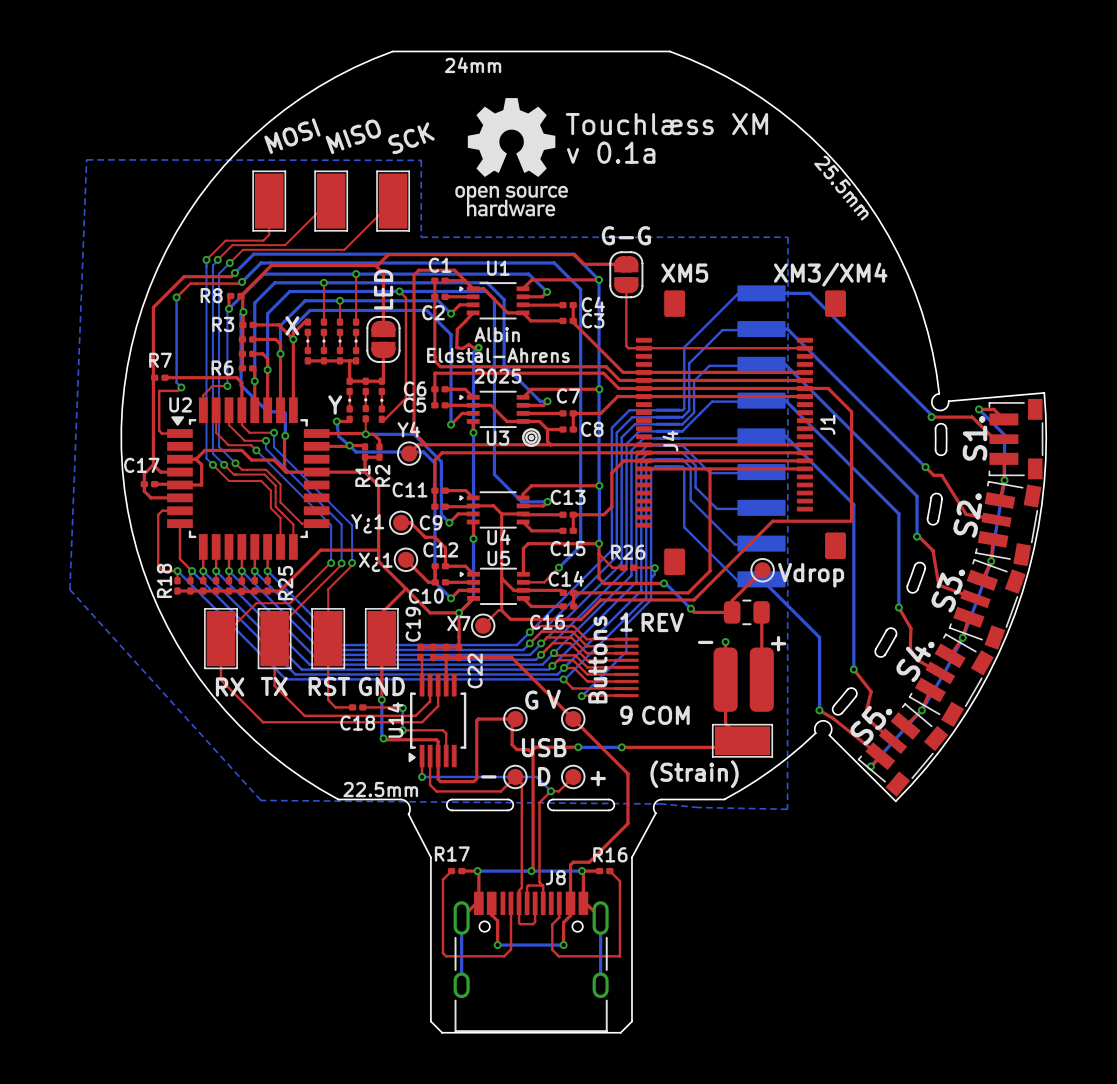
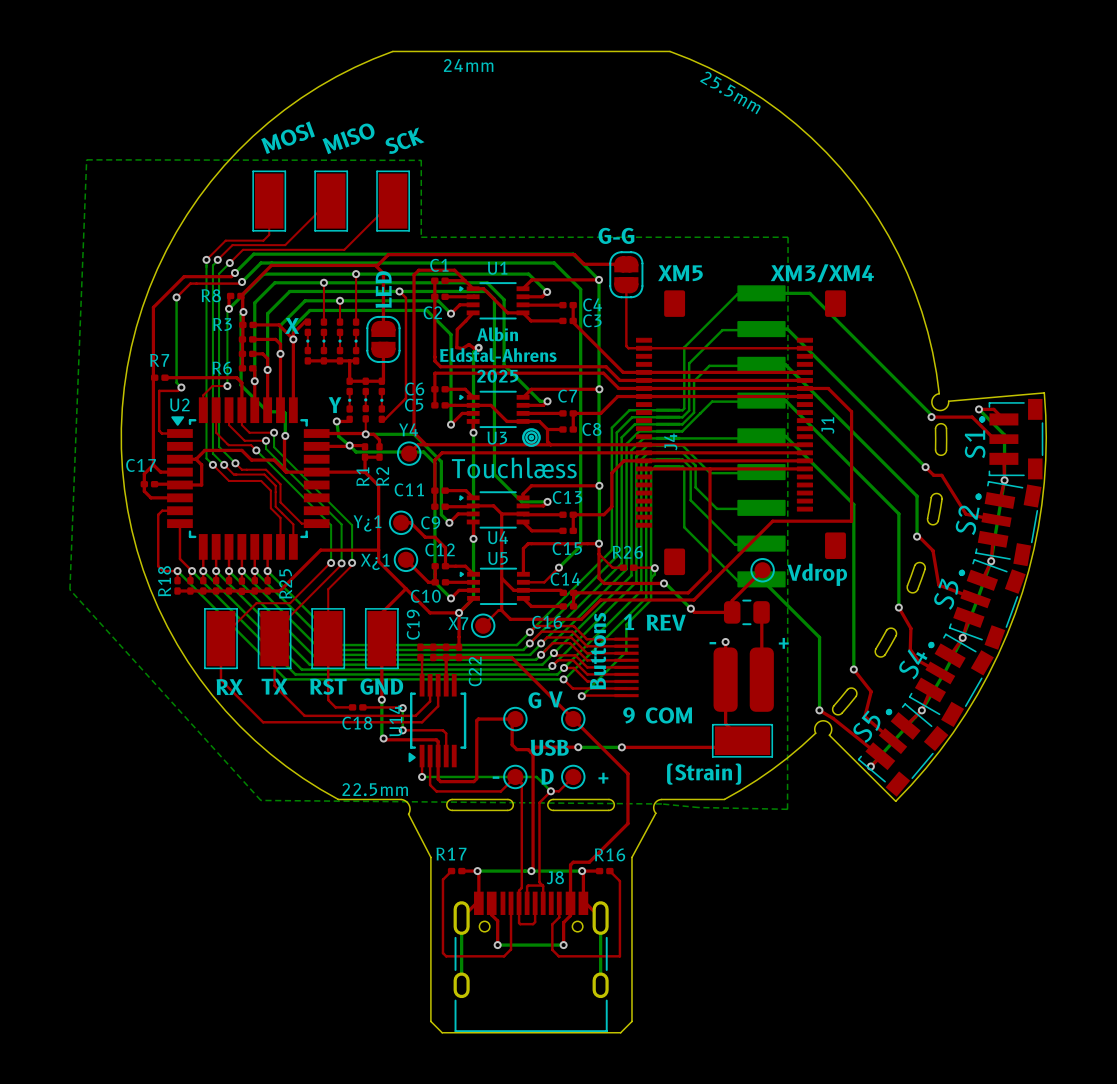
drawing: [455, 98, 568, 217] -> none
text: Touchlæss XM (666, 124) -> none
text: v 0.1a (611, 152) -> none
text rotation: 0° (841, 188) -> 20° counterclockwise (730, 93)
text position: 25.5mm (841, 188) -> 25.5mm (730, 93)
text: none -> Touchlæss (514, 467)

